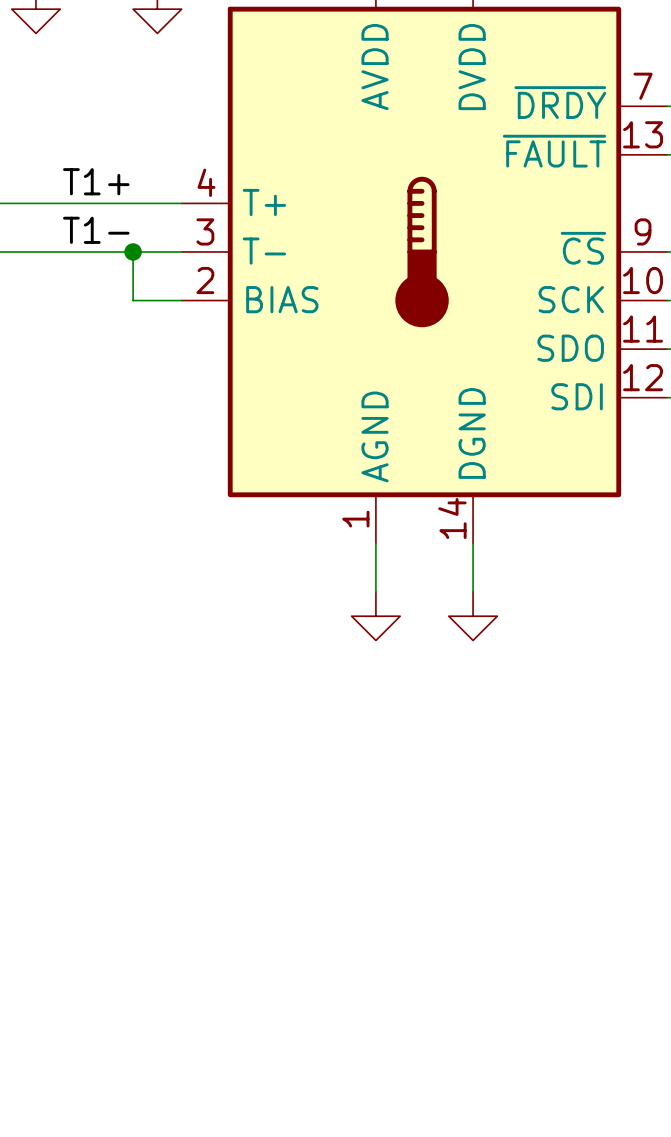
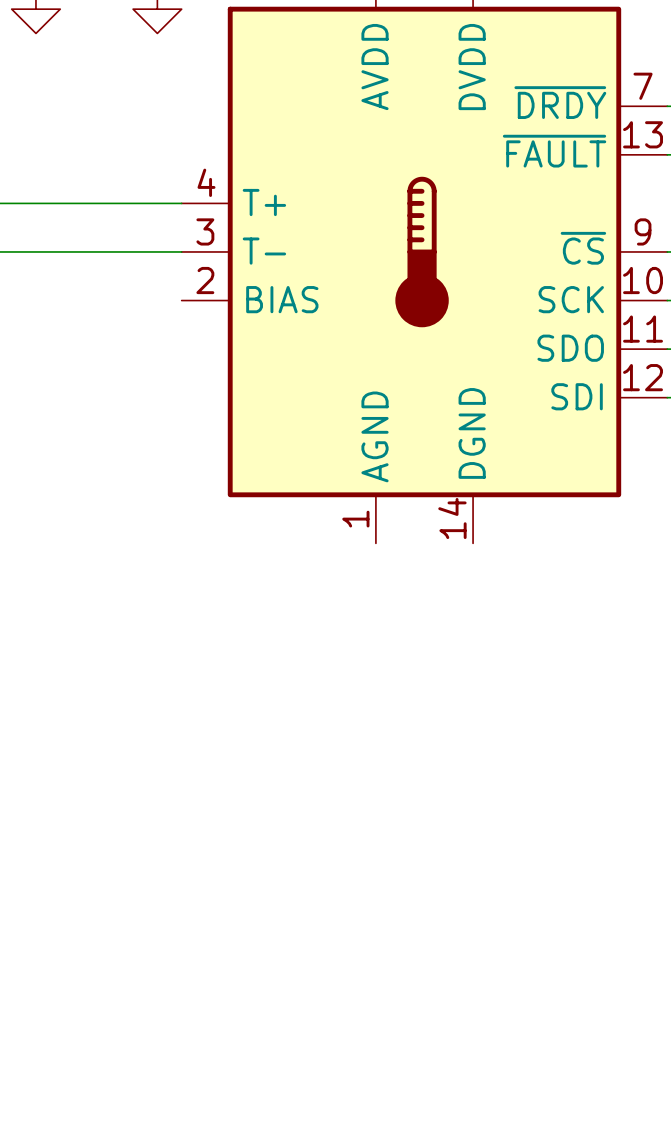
label: T1+ (96, 181) -> none
label: T1- (96, 230) -> none
wire: (133, 251) (133, 300) (181, 300) -> none
junction: (133, 251) -> none
wire: (375, 543) (375, 591) -> none
wire: (473, 543) (473, 591) -> none
power symbol: (375, 616) -> none
power symbol: (473, 616) -> none

